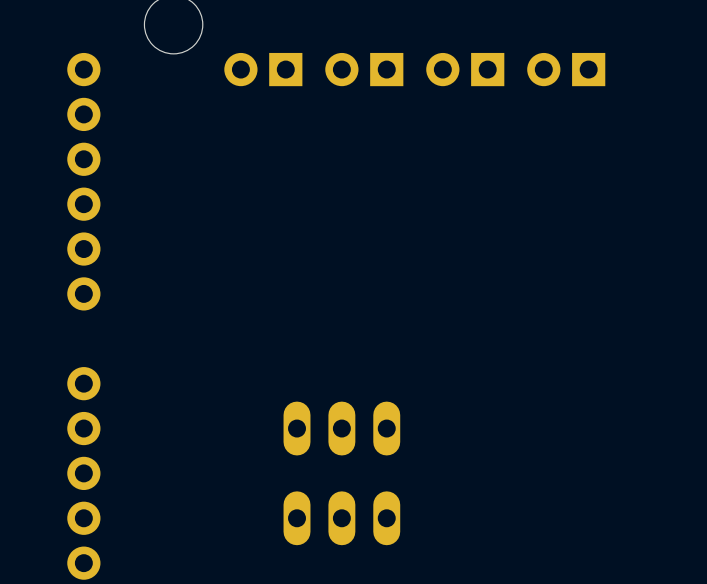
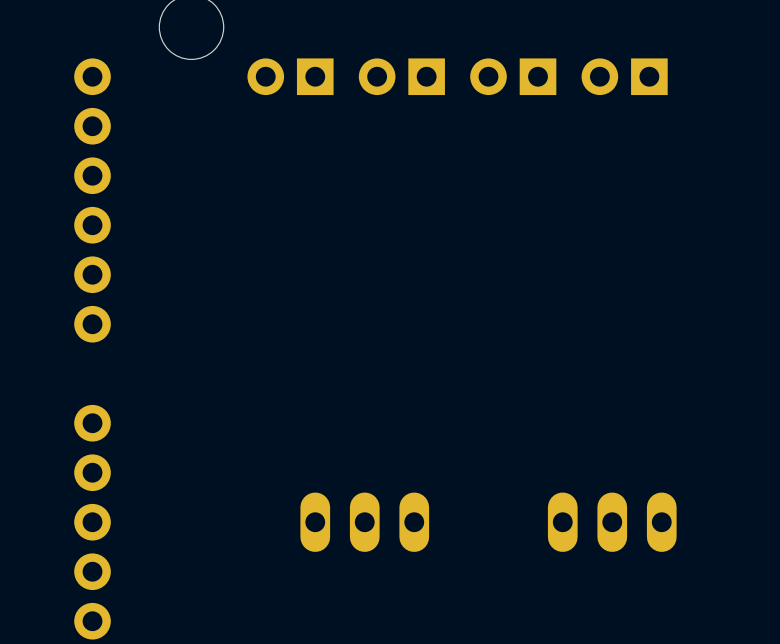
part: (341, 428) -> none
part: none -> (364, 522)
part: none -> (612, 522)
part: (341, 518) -> none

